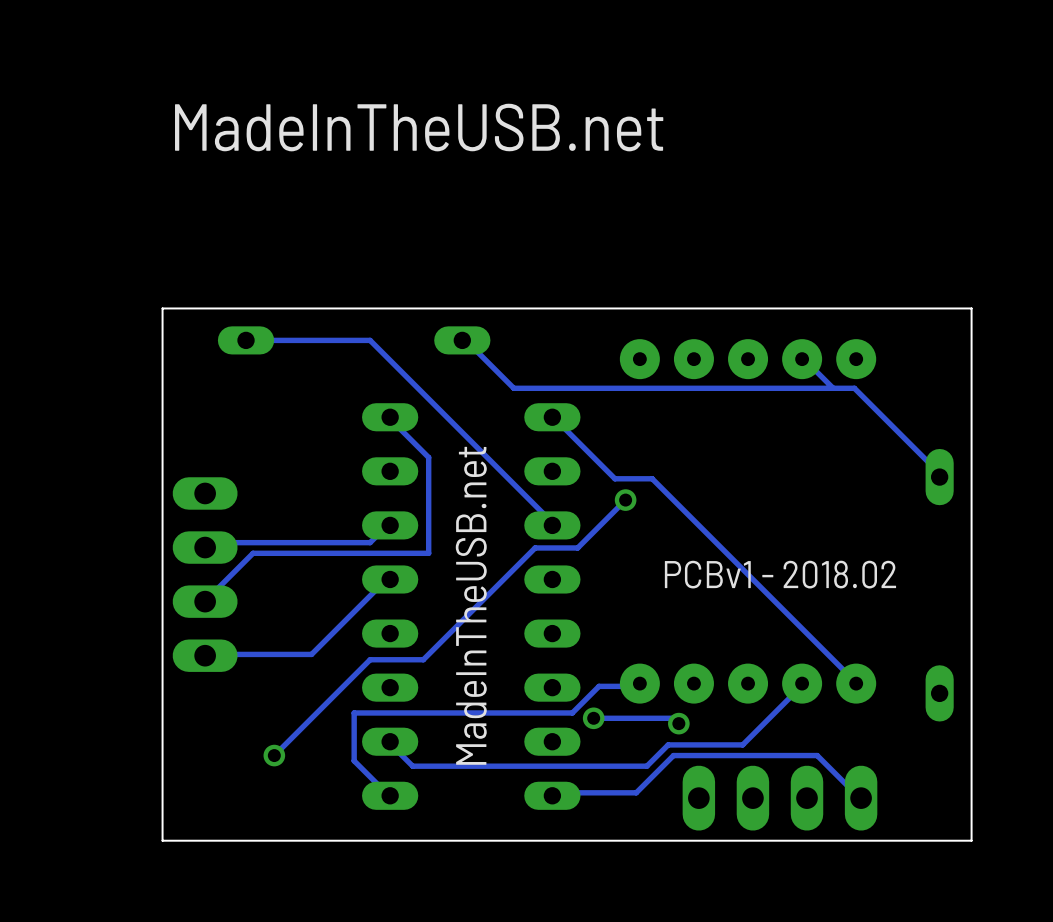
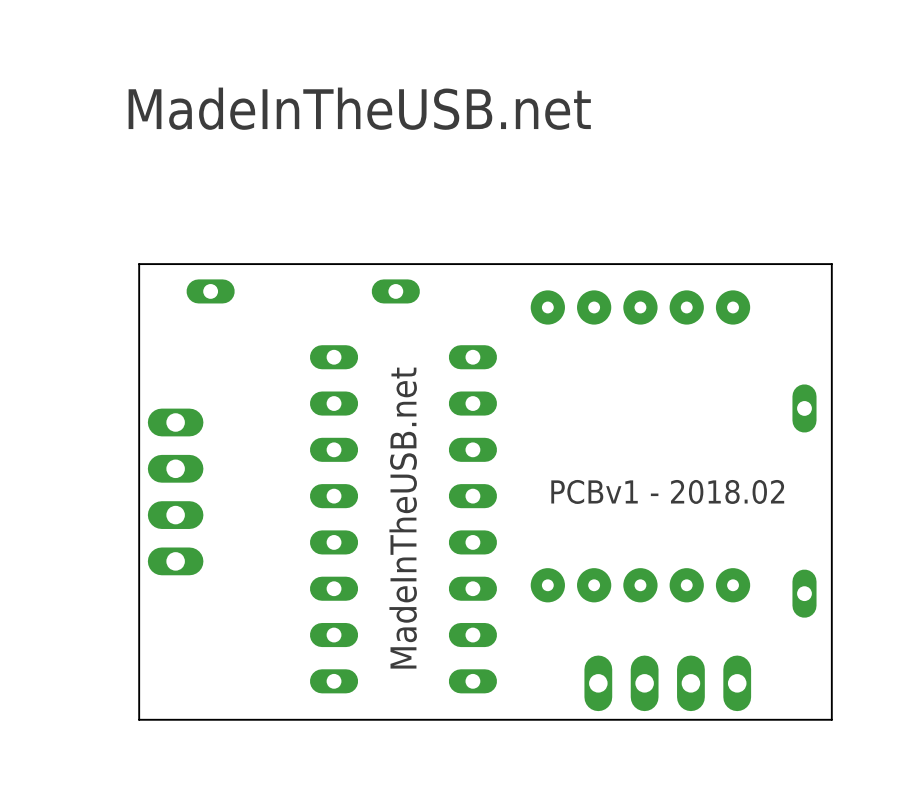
track: (246, 340) (370, 340) (551, 521) (552, 525) -> none
track: (462, 340) (465, 340) (513, 388) (854, 388) (939, 473) (939, 477) -> none
track: (802, 359) (833, 388) -> none
track: (390, 417) (428, 457) (428, 553) (253, 553) (205, 601) -> none
track: (552, 417) (614, 478) (652, 478) (856, 683) -> none
track: (625, 500) (577, 547) (535, 547) (423, 659) (370, 659) (274, 755) -> none
via: (625, 500) -> none
track: (390, 525) (386, 526) (370, 542) (205, 542) (205, 547) -> none
track: (390, 579) (386, 579) (311, 654) (205, 655) -> none
track: (639, 683) (636, 686) (599, 686) (572, 712) (354, 712) (354, 760) (390, 795) -> none
track: (802, 683) (742, 744) (668, 744) (646, 766) (412, 766) (390, 741) -> none
track: (593, 718) (673, 718) (678, 723) -> none
via: (593, 718) -> none
via: (678, 723) -> none
via: (274, 755) -> none
track: (552, 795) (556, 792) (636, 792) (673, 755) (817, 755) (861, 798) -> none

